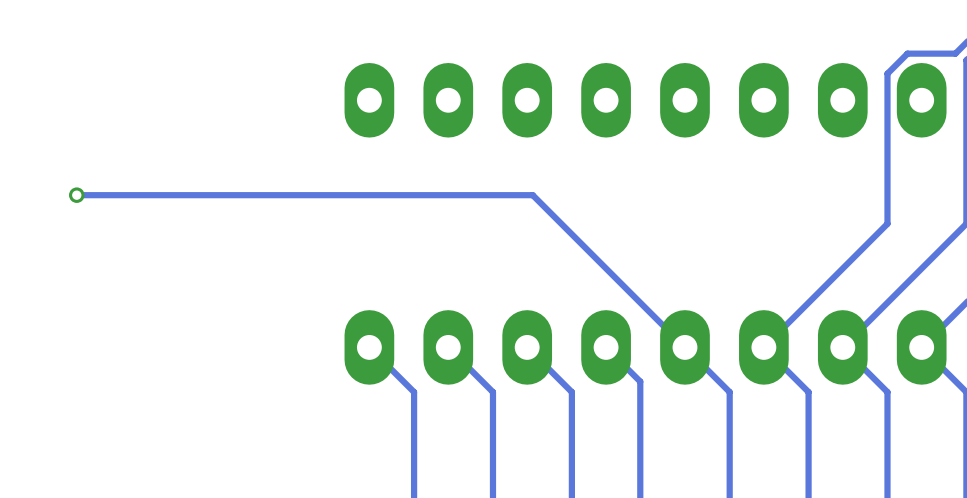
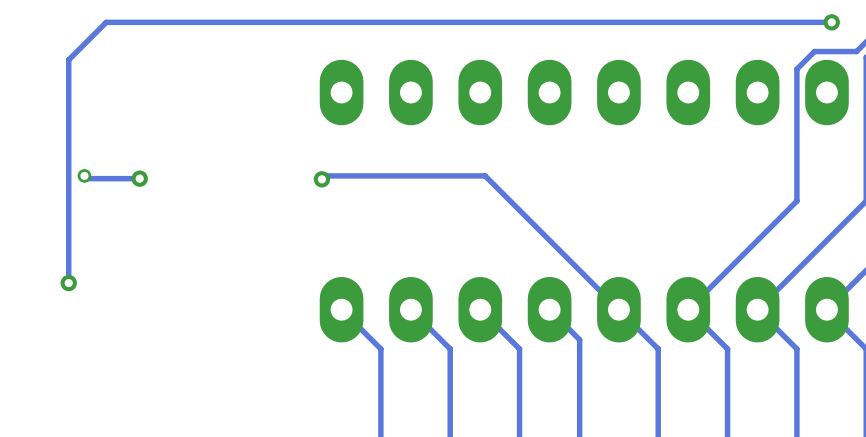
track: none -> (831, 22) (106, 22) (68, 59) (68, 283)
via: none -> (831, 22)
track: (350, 195) (76, 195) -> (139, 178) (87, 178) (84, 175)
via: none -> (139, 178)
via: none -> (321, 179)
via: none -> (68, 283)

